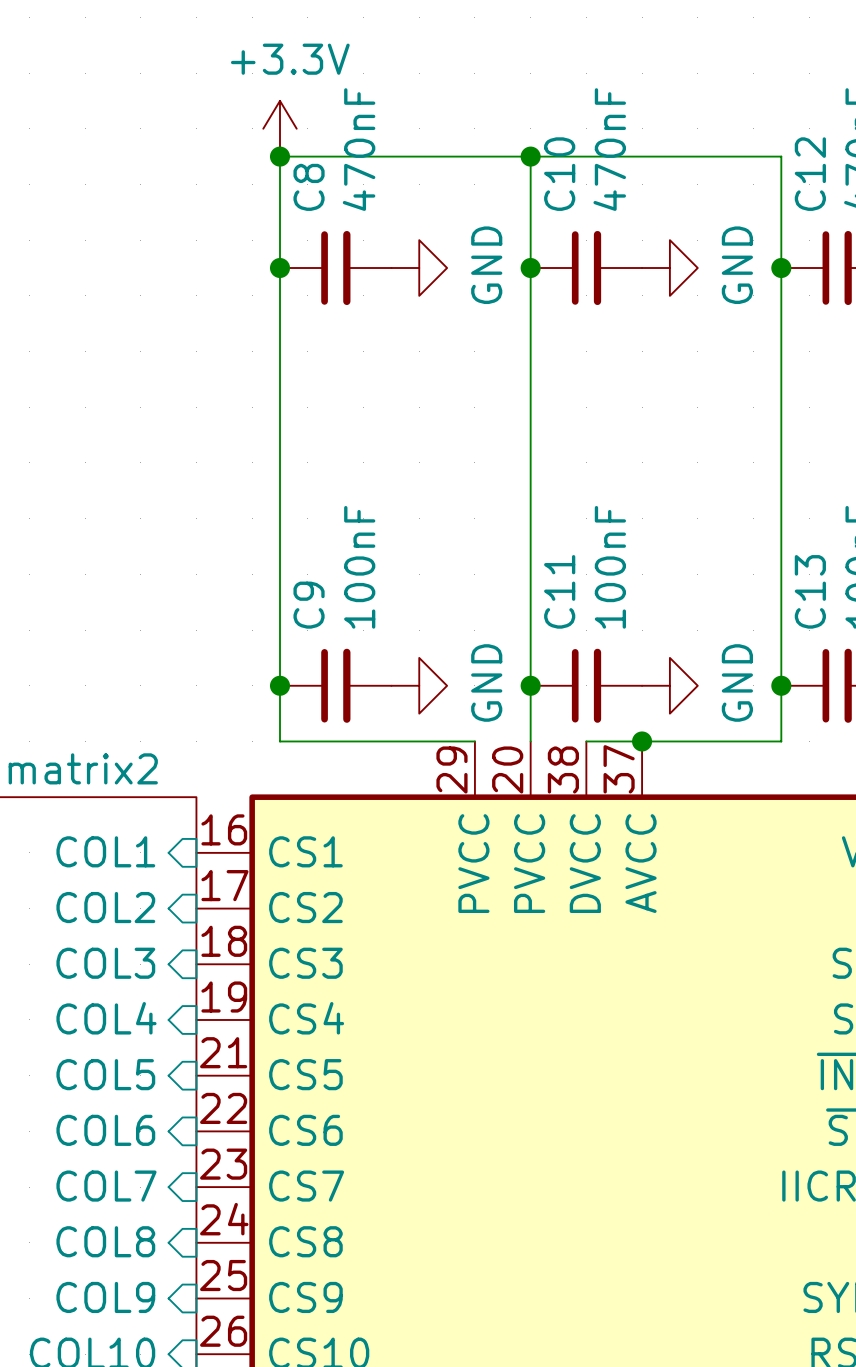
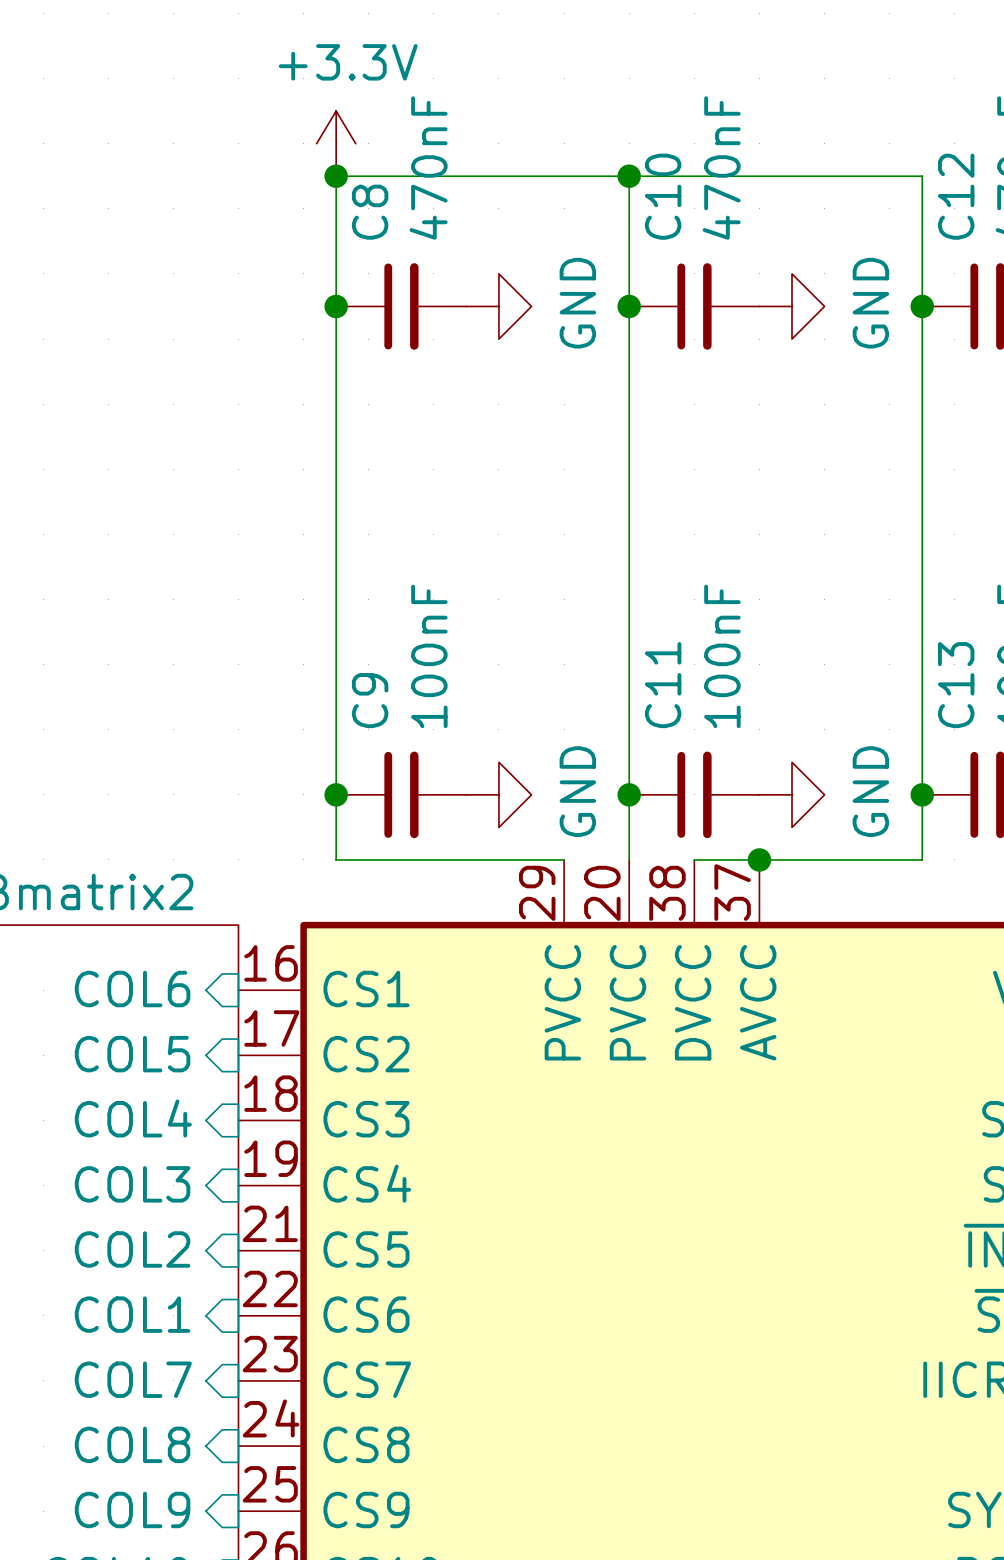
sheet pin: COL1 (105, 851) -> COL6 (132, 989)
sheet pin: COL2 (105, 907) -> COL5 (132, 1054)
sheet pin: COL3 (105, 963) -> COL4 (133, 1118)
sheet pin: COL4 (106, 1018) -> COL3 (132, 1184)
sheet pin: COL5 (105, 1074) -> COL2 (132, 1249)
sheet pin: COL6 (105, 1130) -> COL1 (132, 1314)

